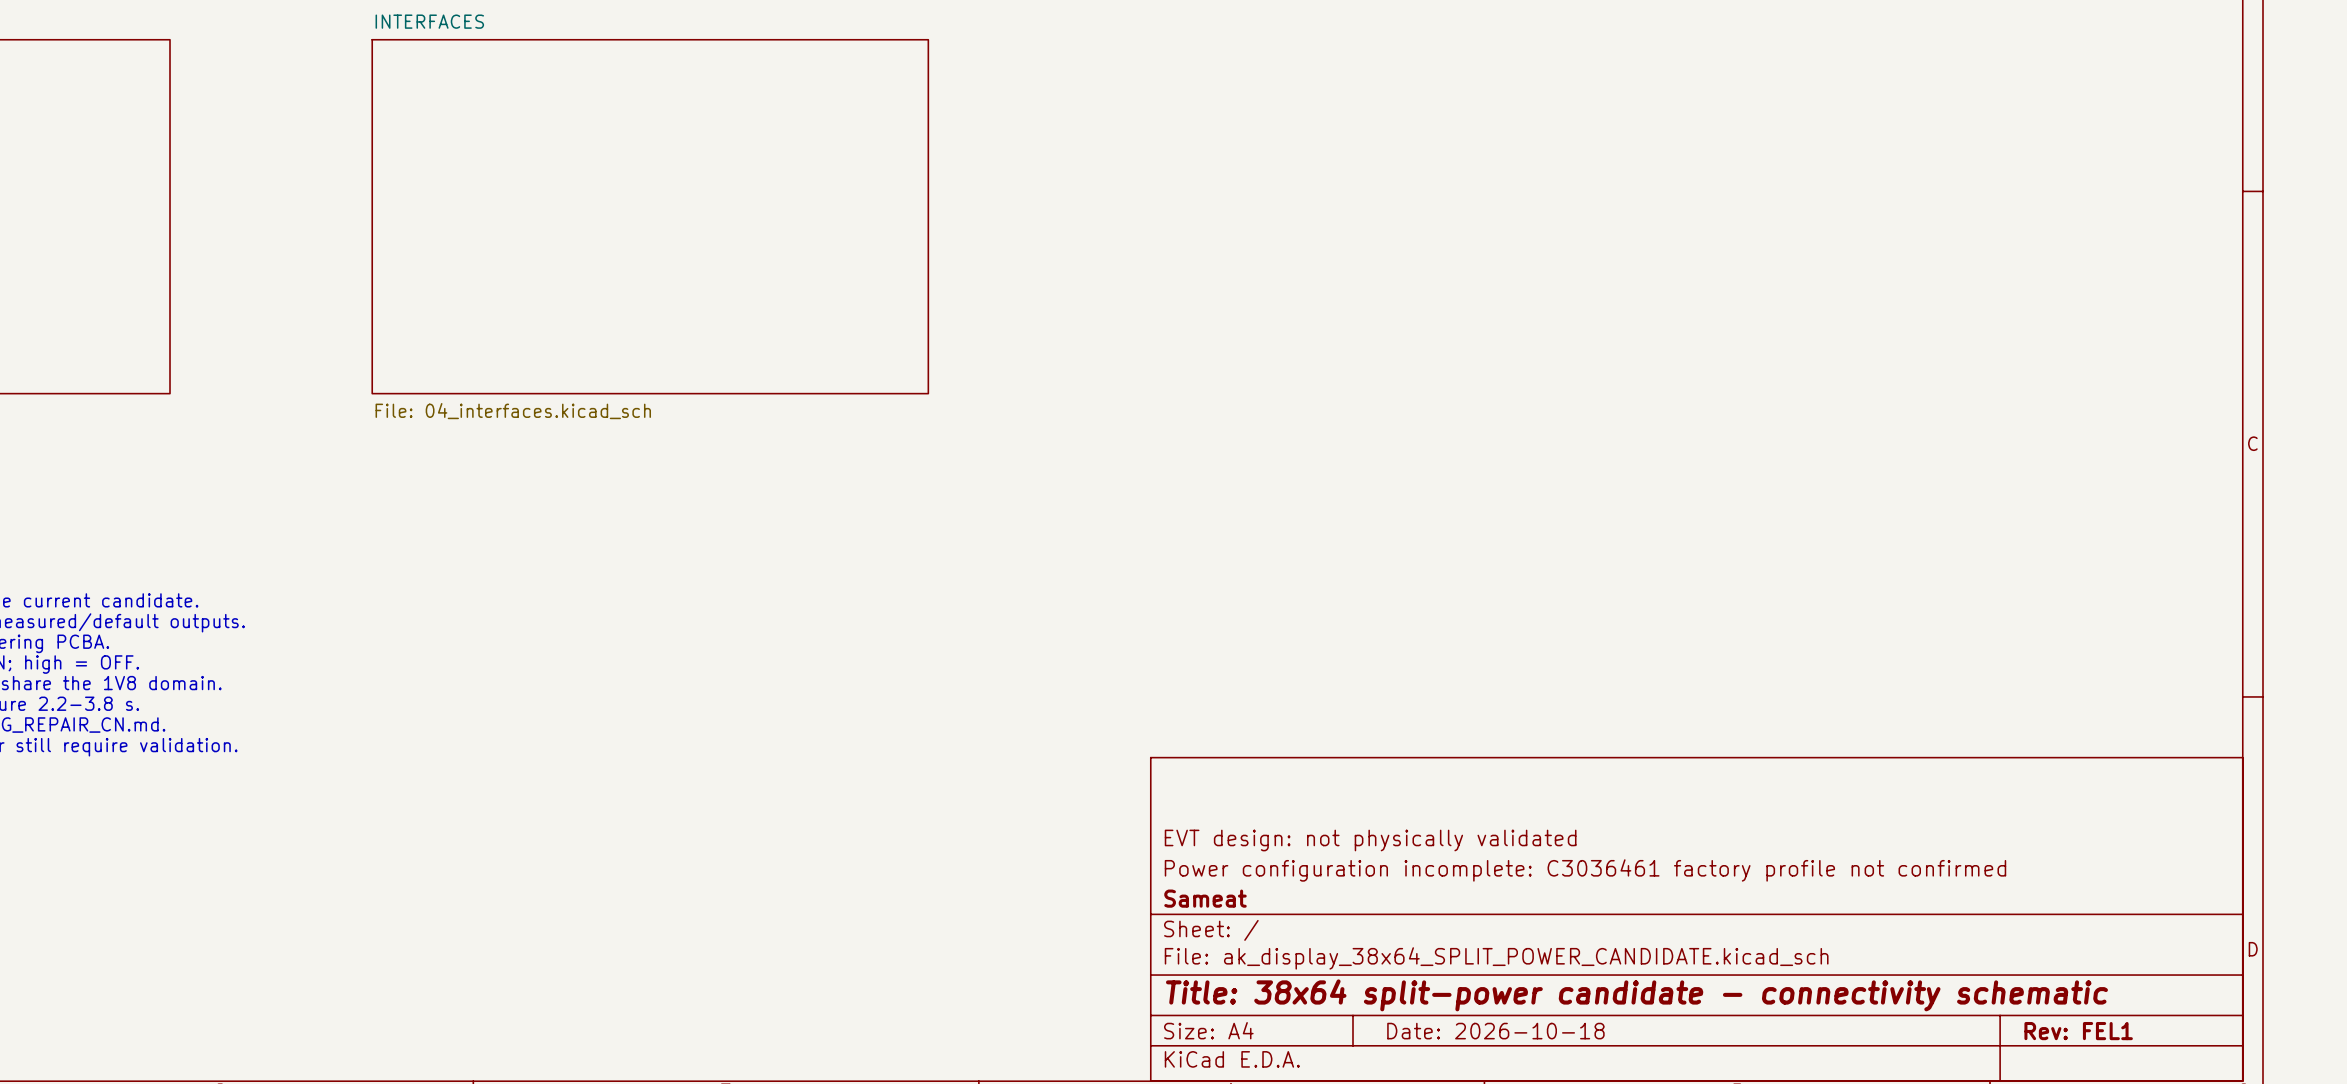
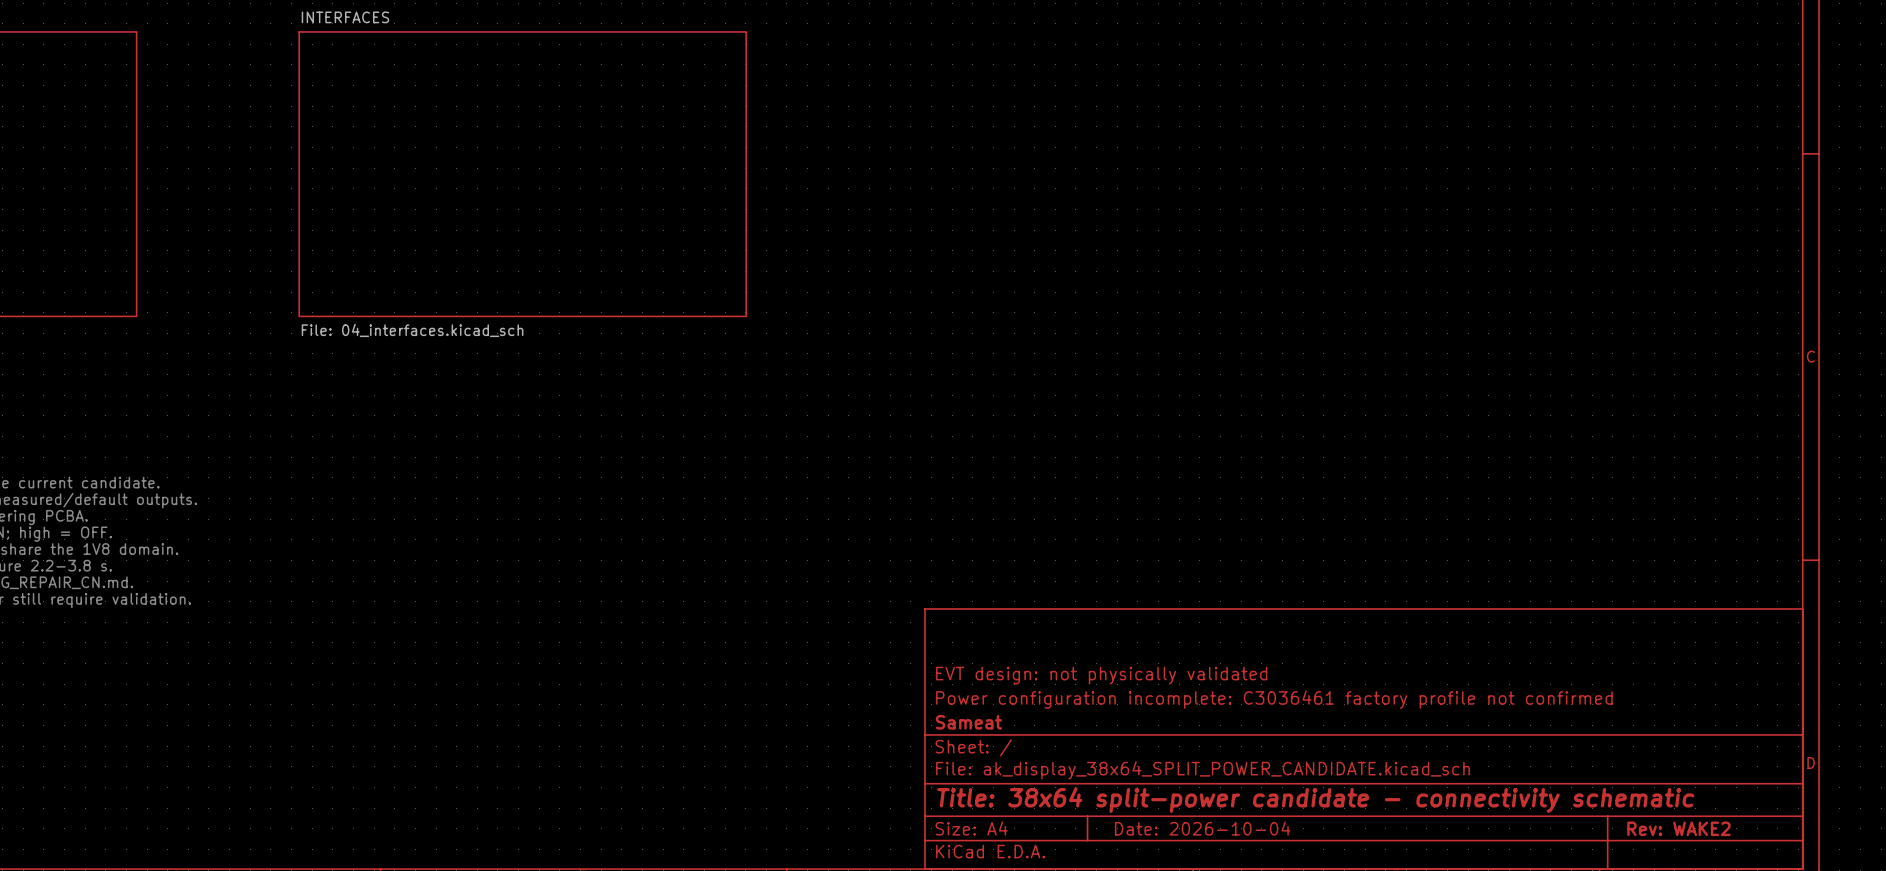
title block: Date: 2026-10-18 (1495, 1031) -> Date: 2026-10-04 (1202, 828)
title block: Rev: FEL1 (2078, 1031) -> Rev: WAKE2 (1678, 828)

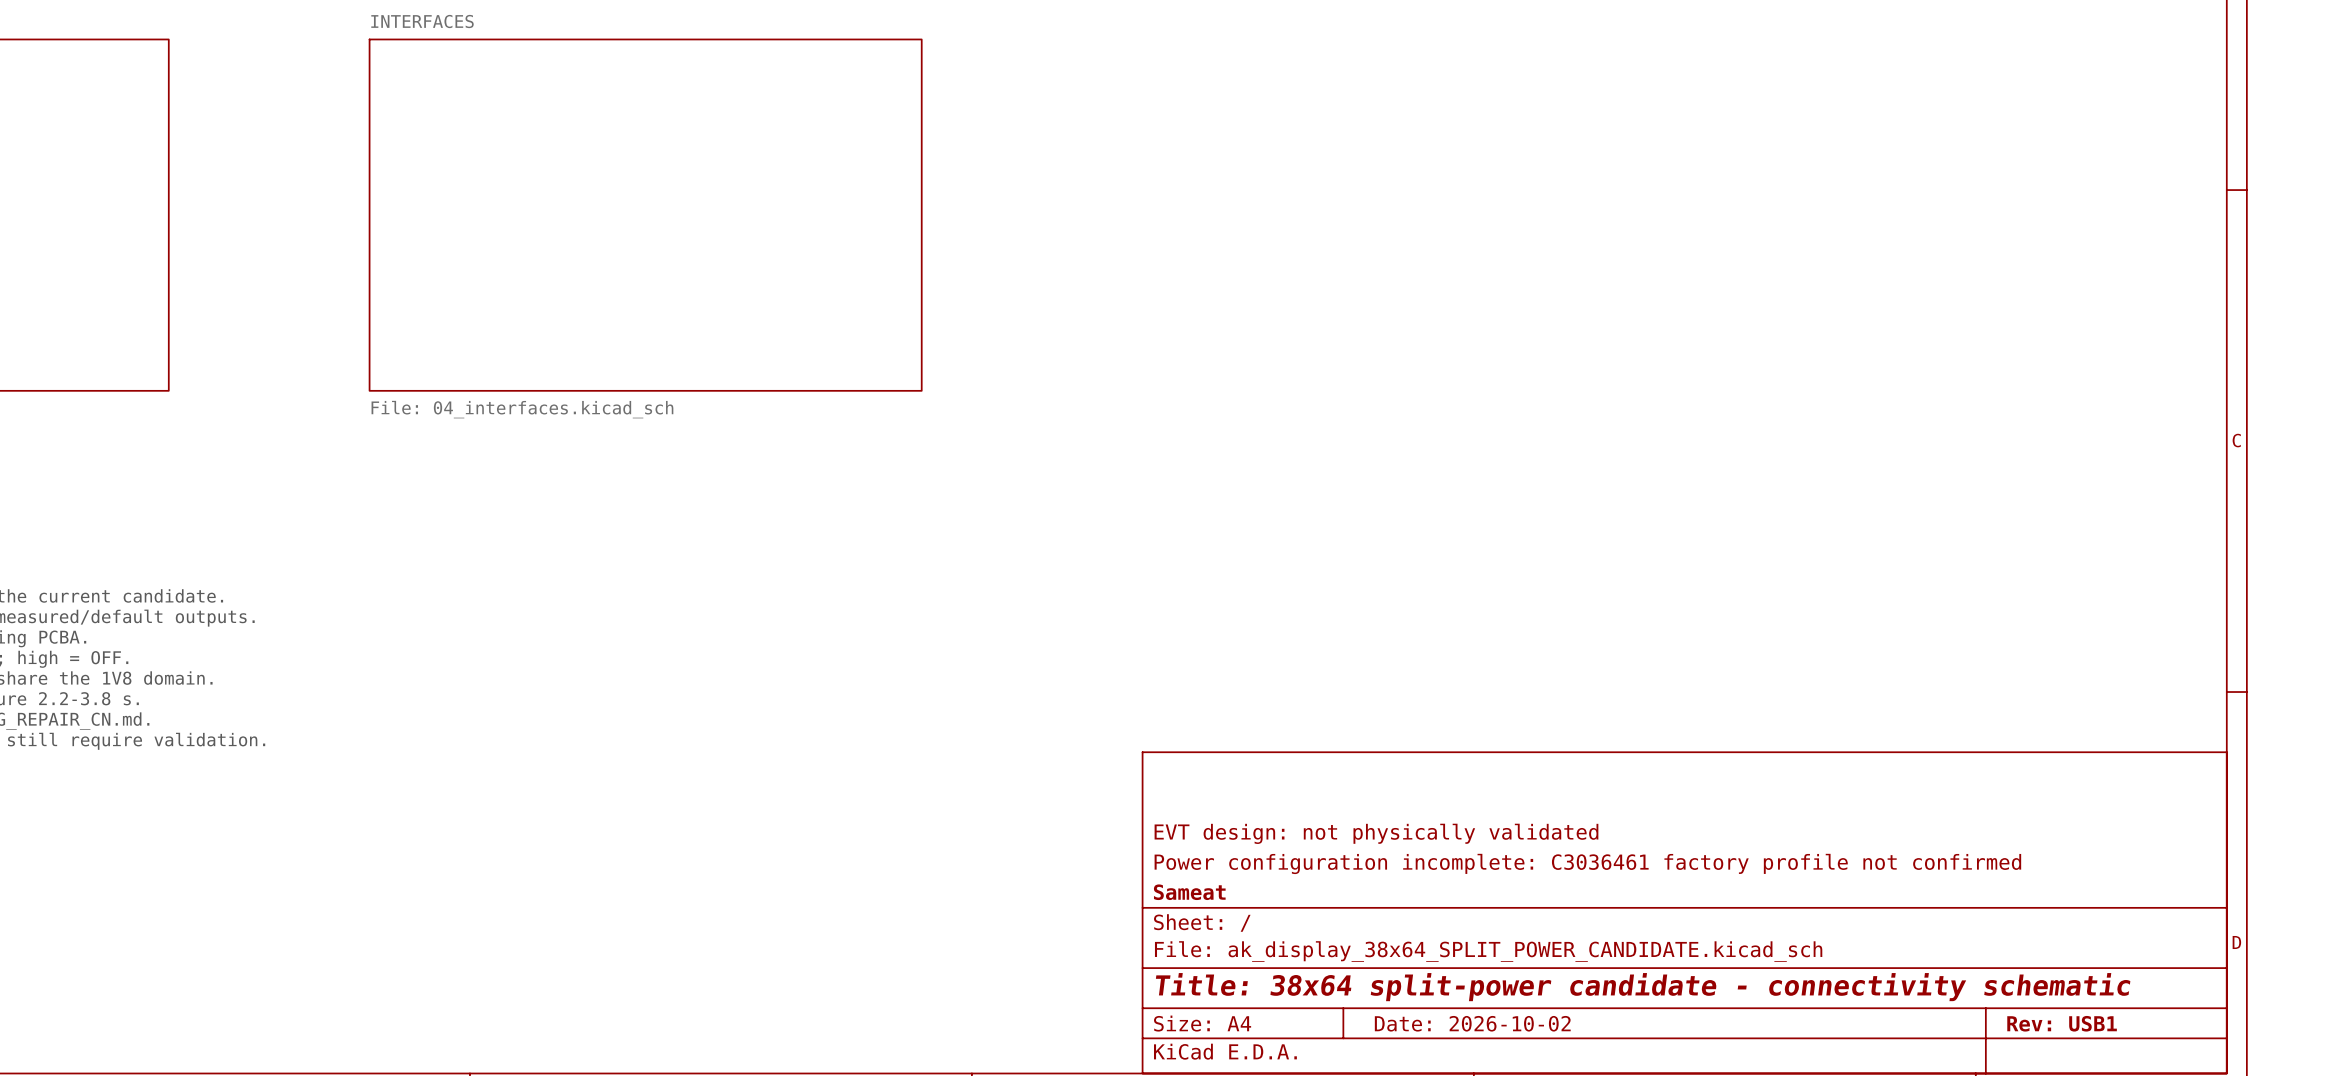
title block: Date: 2026-10-04 (1202, 828) -> Date: 2026-10-02 (1472, 1023)
title block: Rev: WAKE2 (1678, 828) -> Rev: USB1 (2062, 1023)

